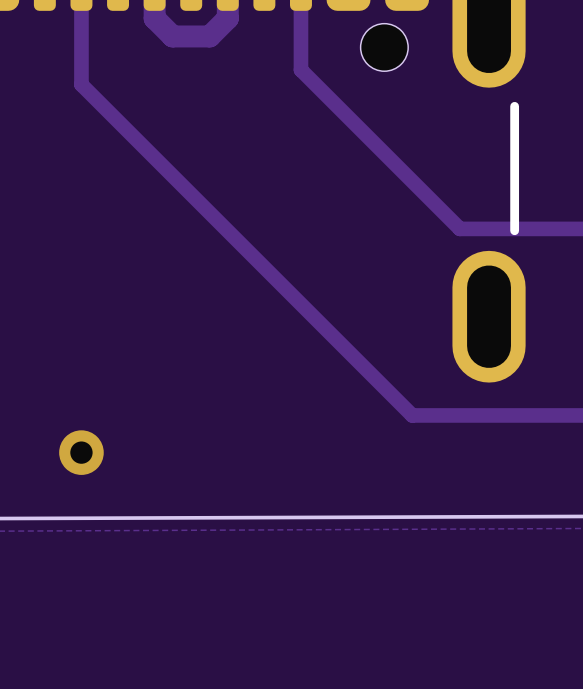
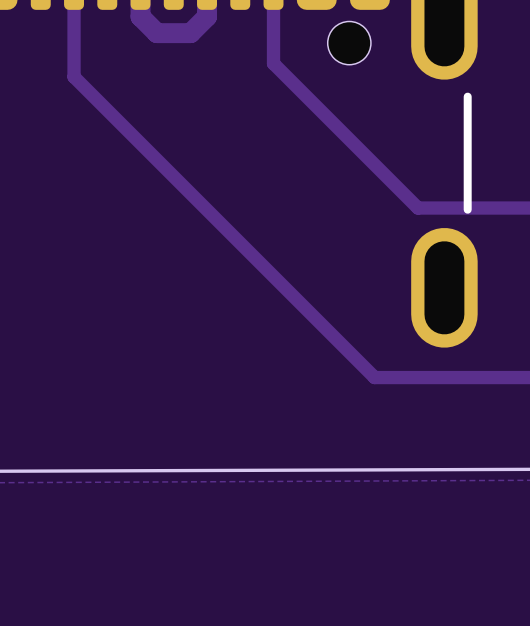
via: (81, 452) -> none

